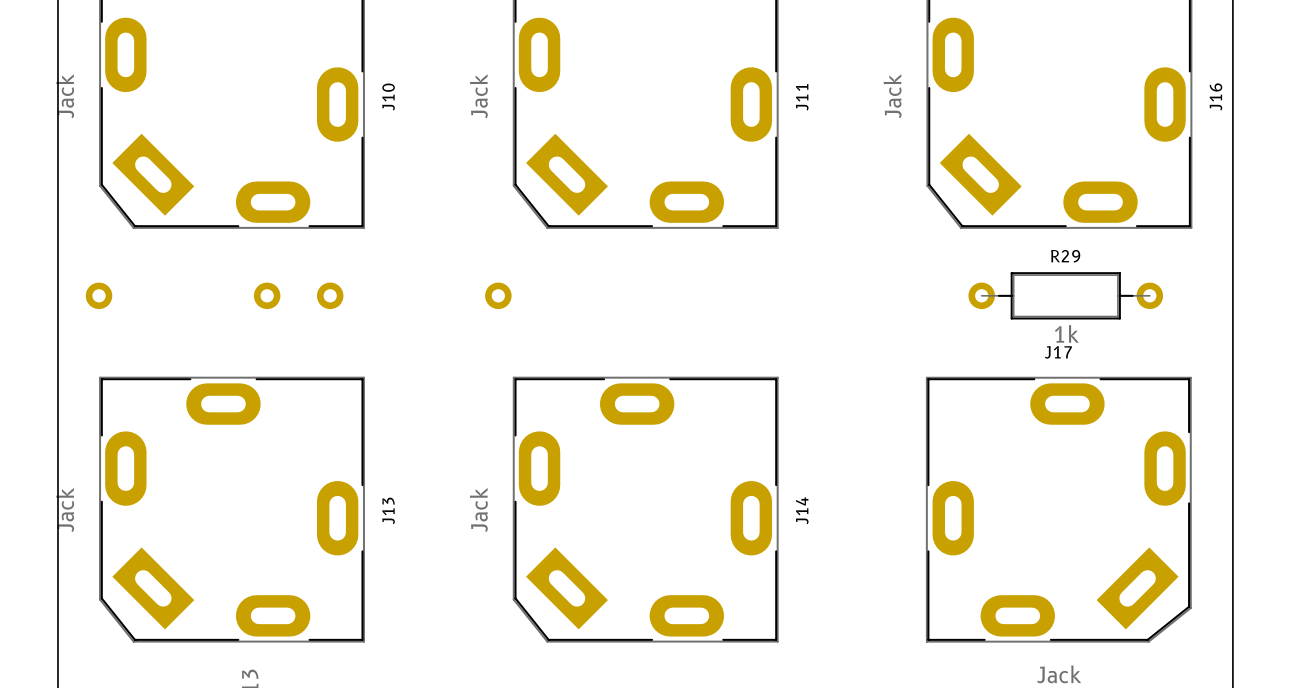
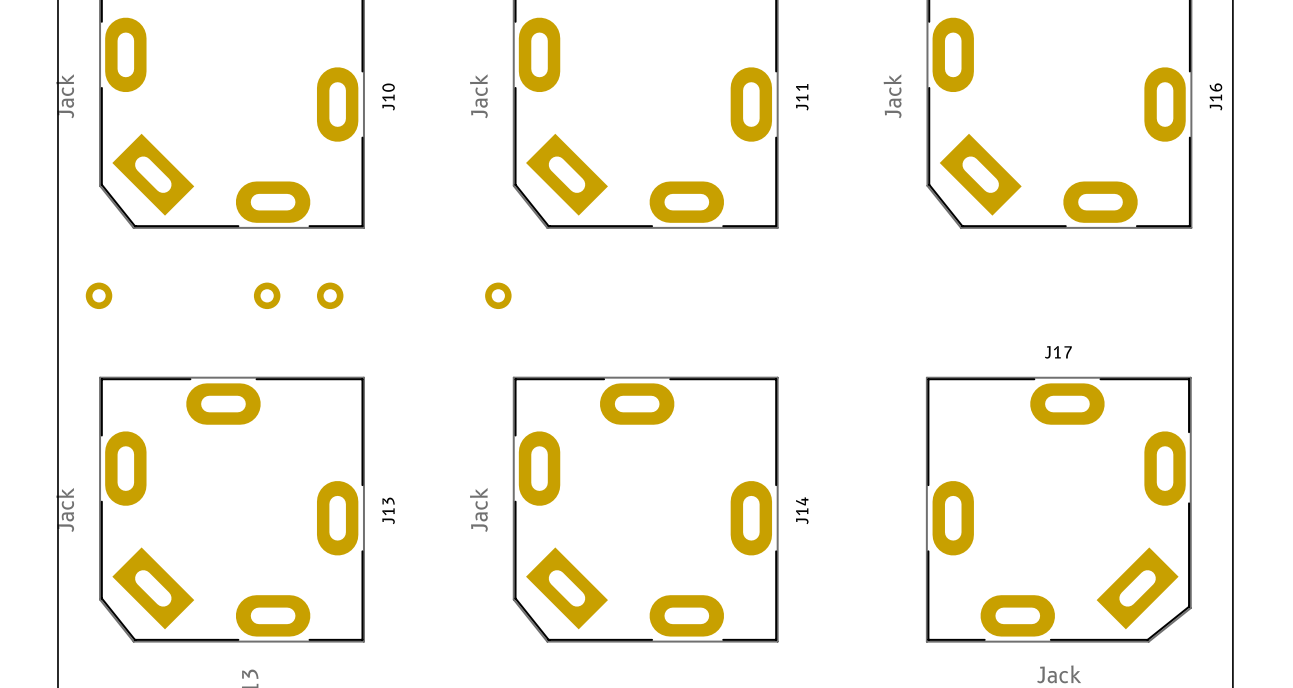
R29: 1k (1065, 295) -> none

